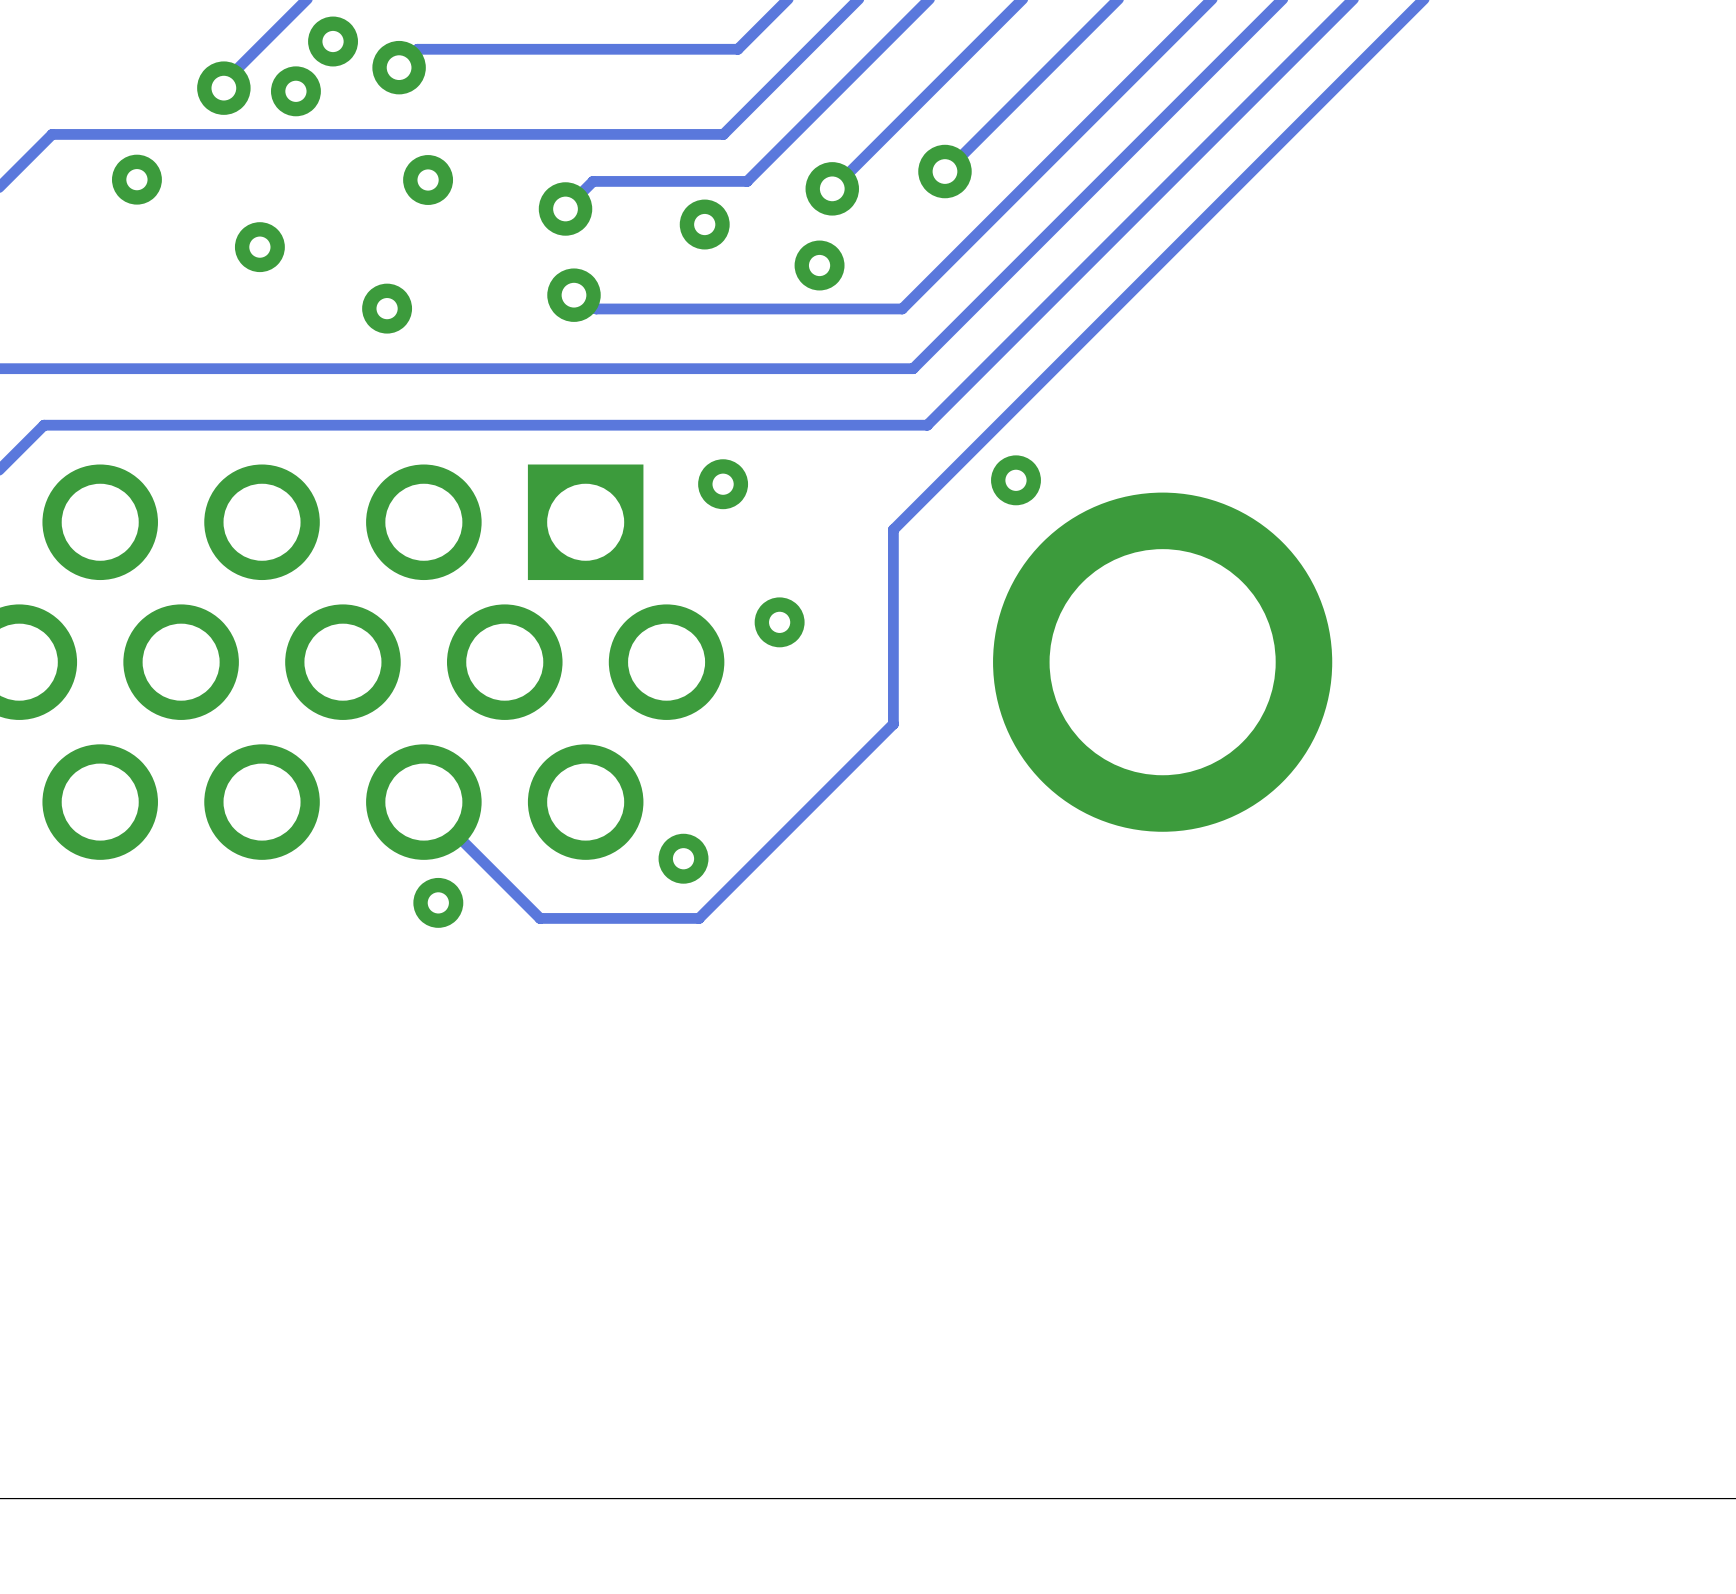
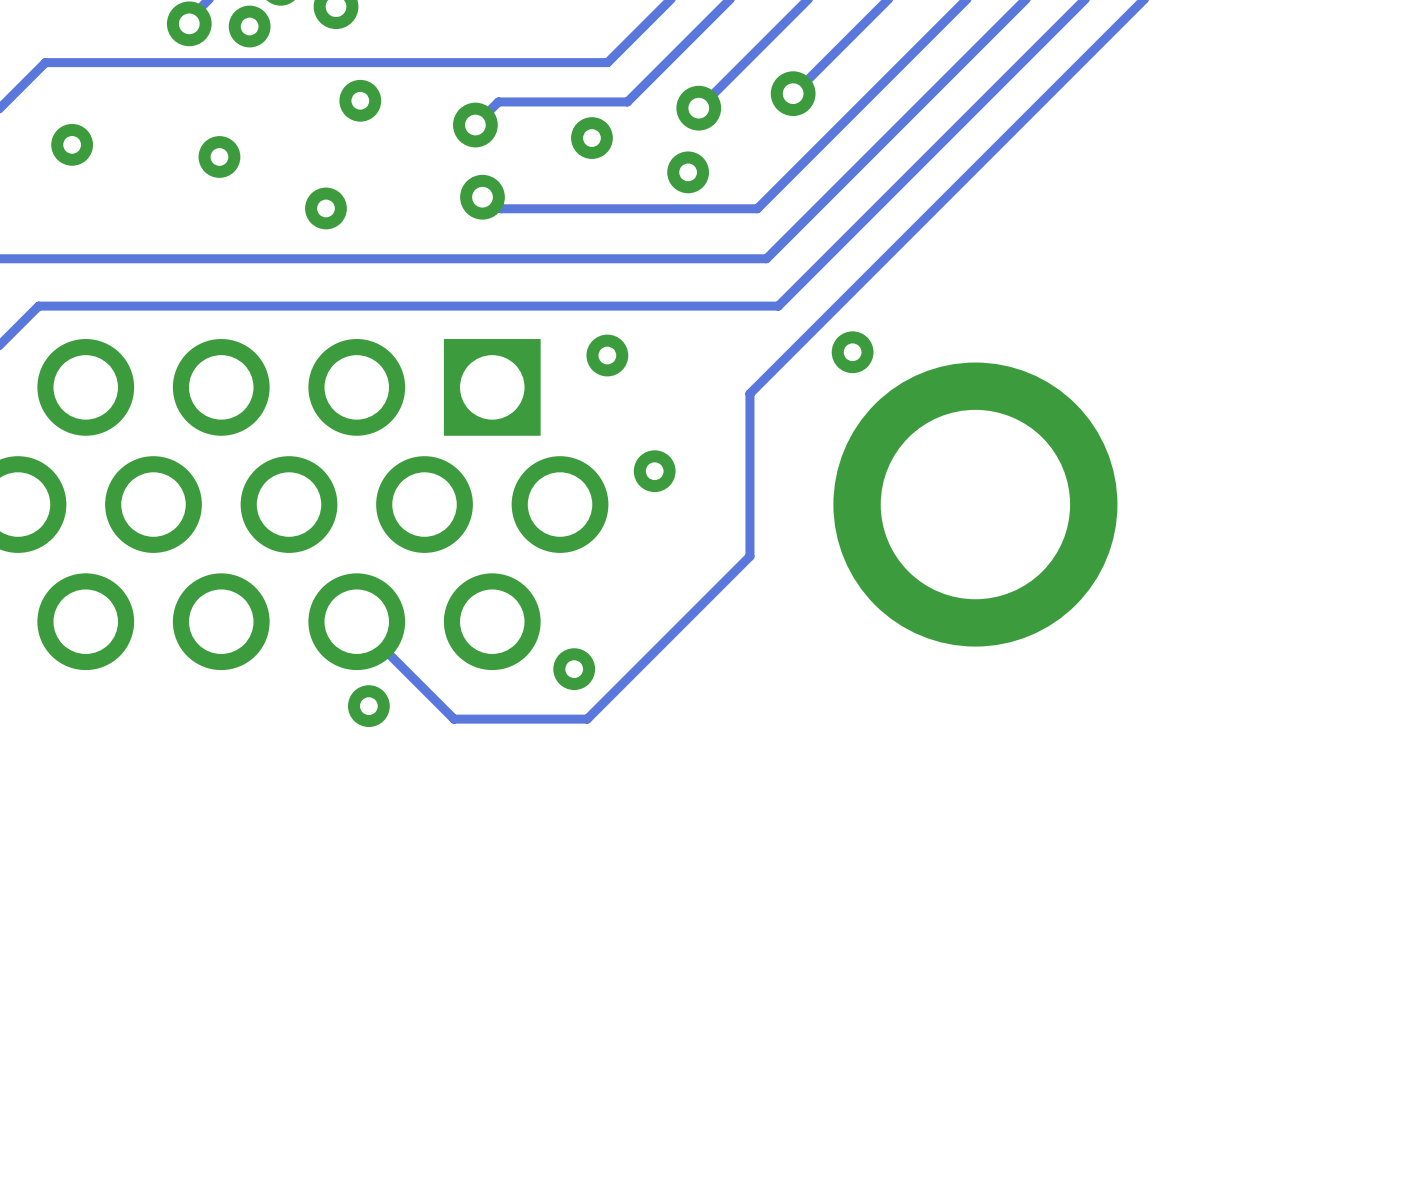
via position: (136, 179) -> (72, 144)

